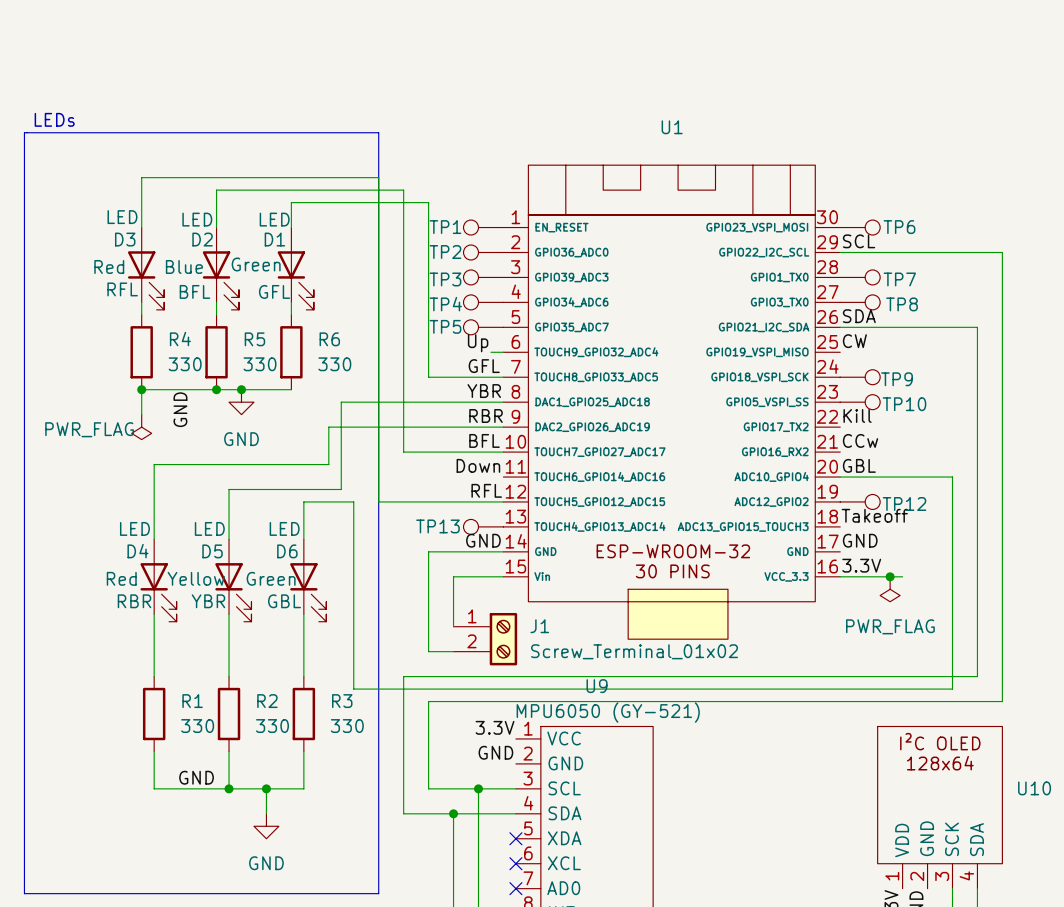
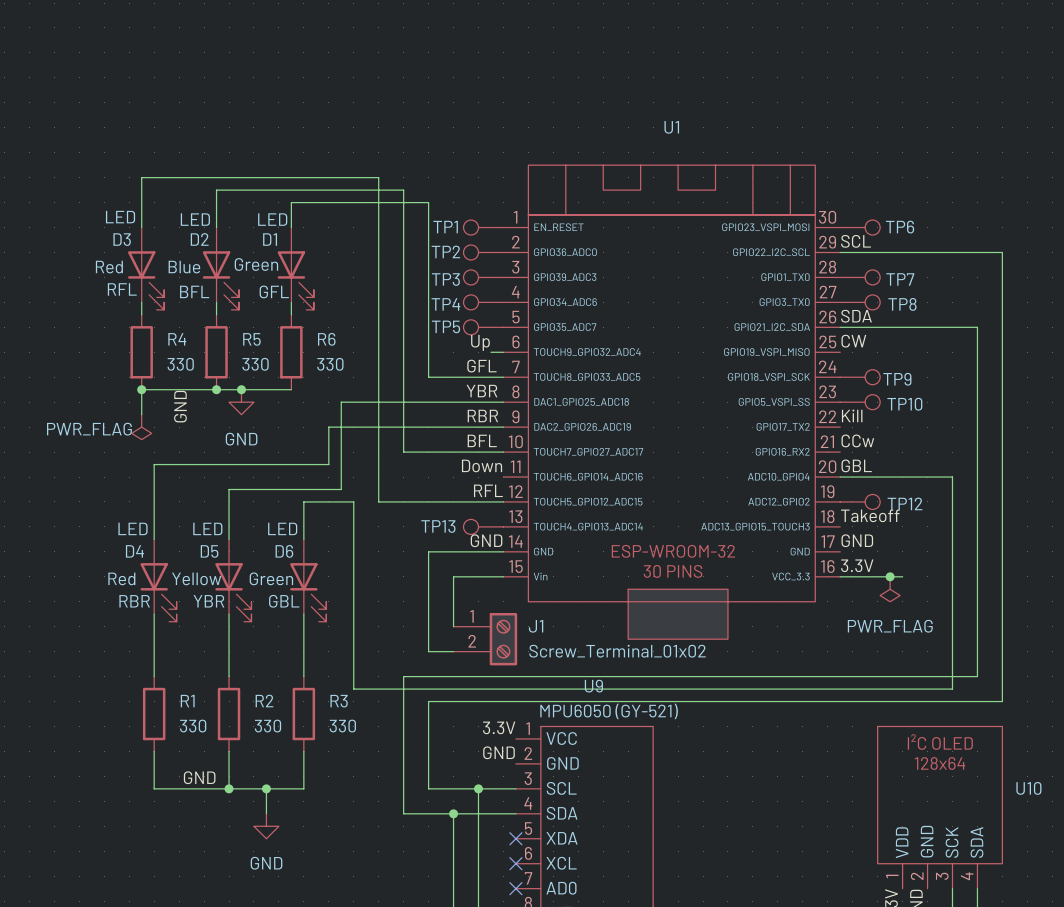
text: LEDs (54, 119) -> none
line: (24, 132) (378, 132) (378, 893) (24, 893) (24, 132) -> none

